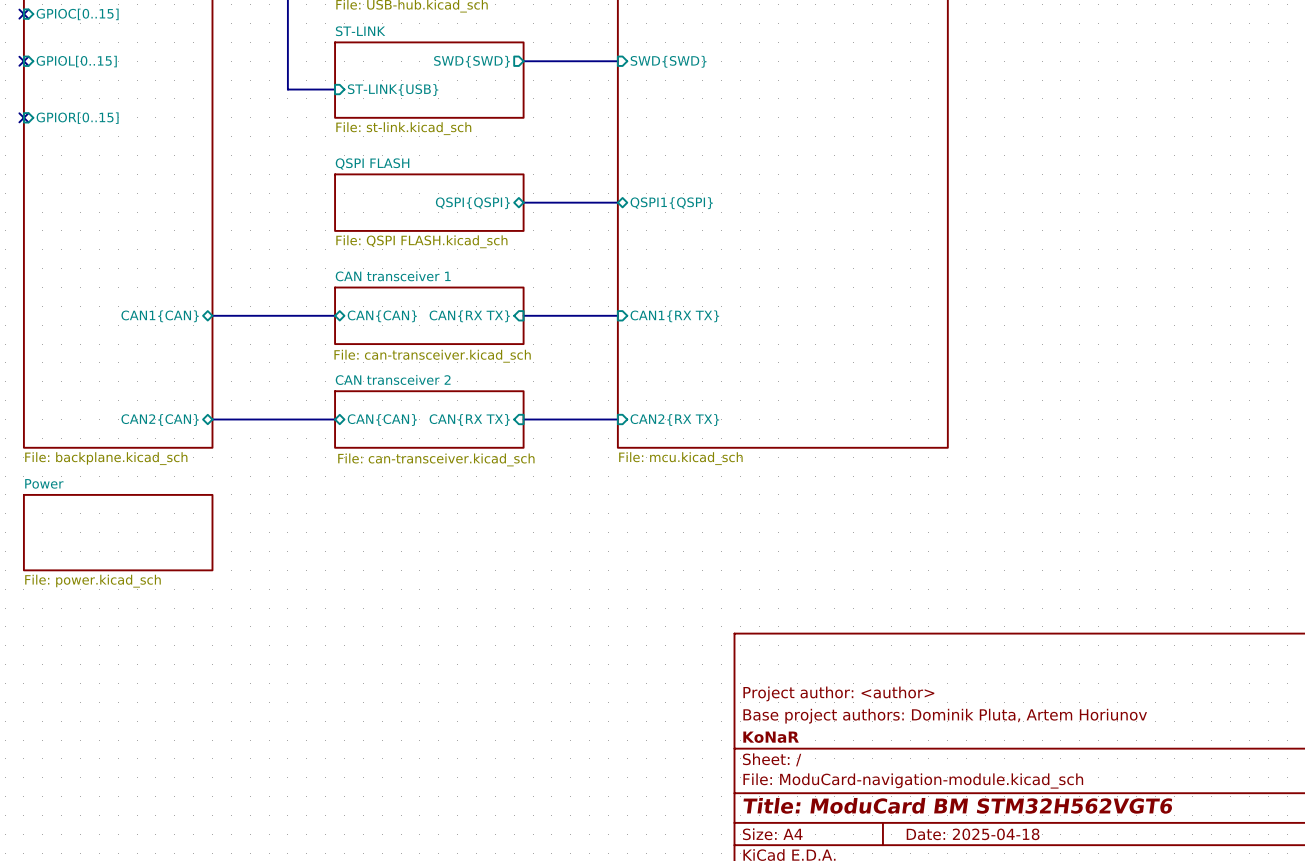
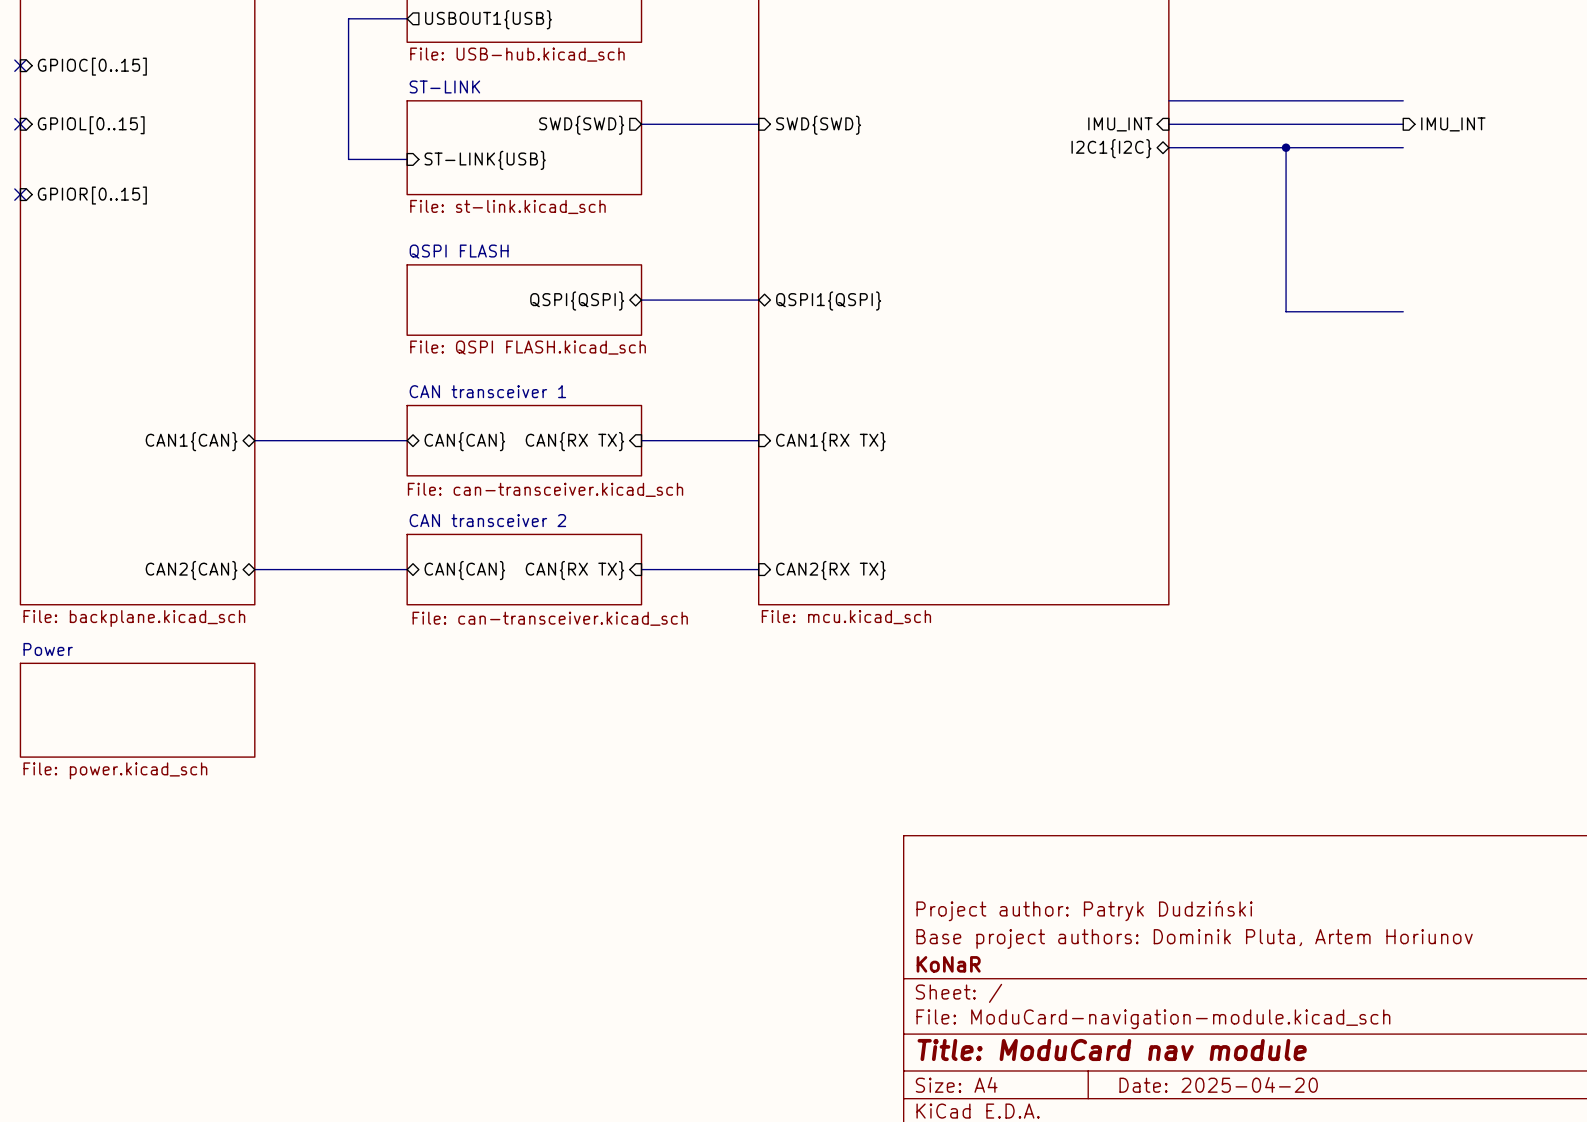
wire: none -> (1168, 100) (1403, 100)
wire: none -> (1168, 124) (1403, 124)
sheet pin: none -> IMU_INT (1120, 124)
sheet pin: none -> IMU_INT (1453, 124)
sheet pin: none -> I2C1{I2C} (1111, 148)
bus: none -> (1168, 147) (1403, 147)
bus: none -> (1286, 147) (1286, 311) (1403, 311)
junction: none -> (1286, 147)
title block: Project author: <author> (838, 693) -> Project author: Patryk Dudziński (1084, 910)
title block: Title: ModuCard BM STM32H562VGT6 (957, 805) -> Title: ModuCard nav module (1112, 1050)
title block: Date: 2025-04-18 (973, 834) -> Date: 2025-04-20 (1218, 1084)

